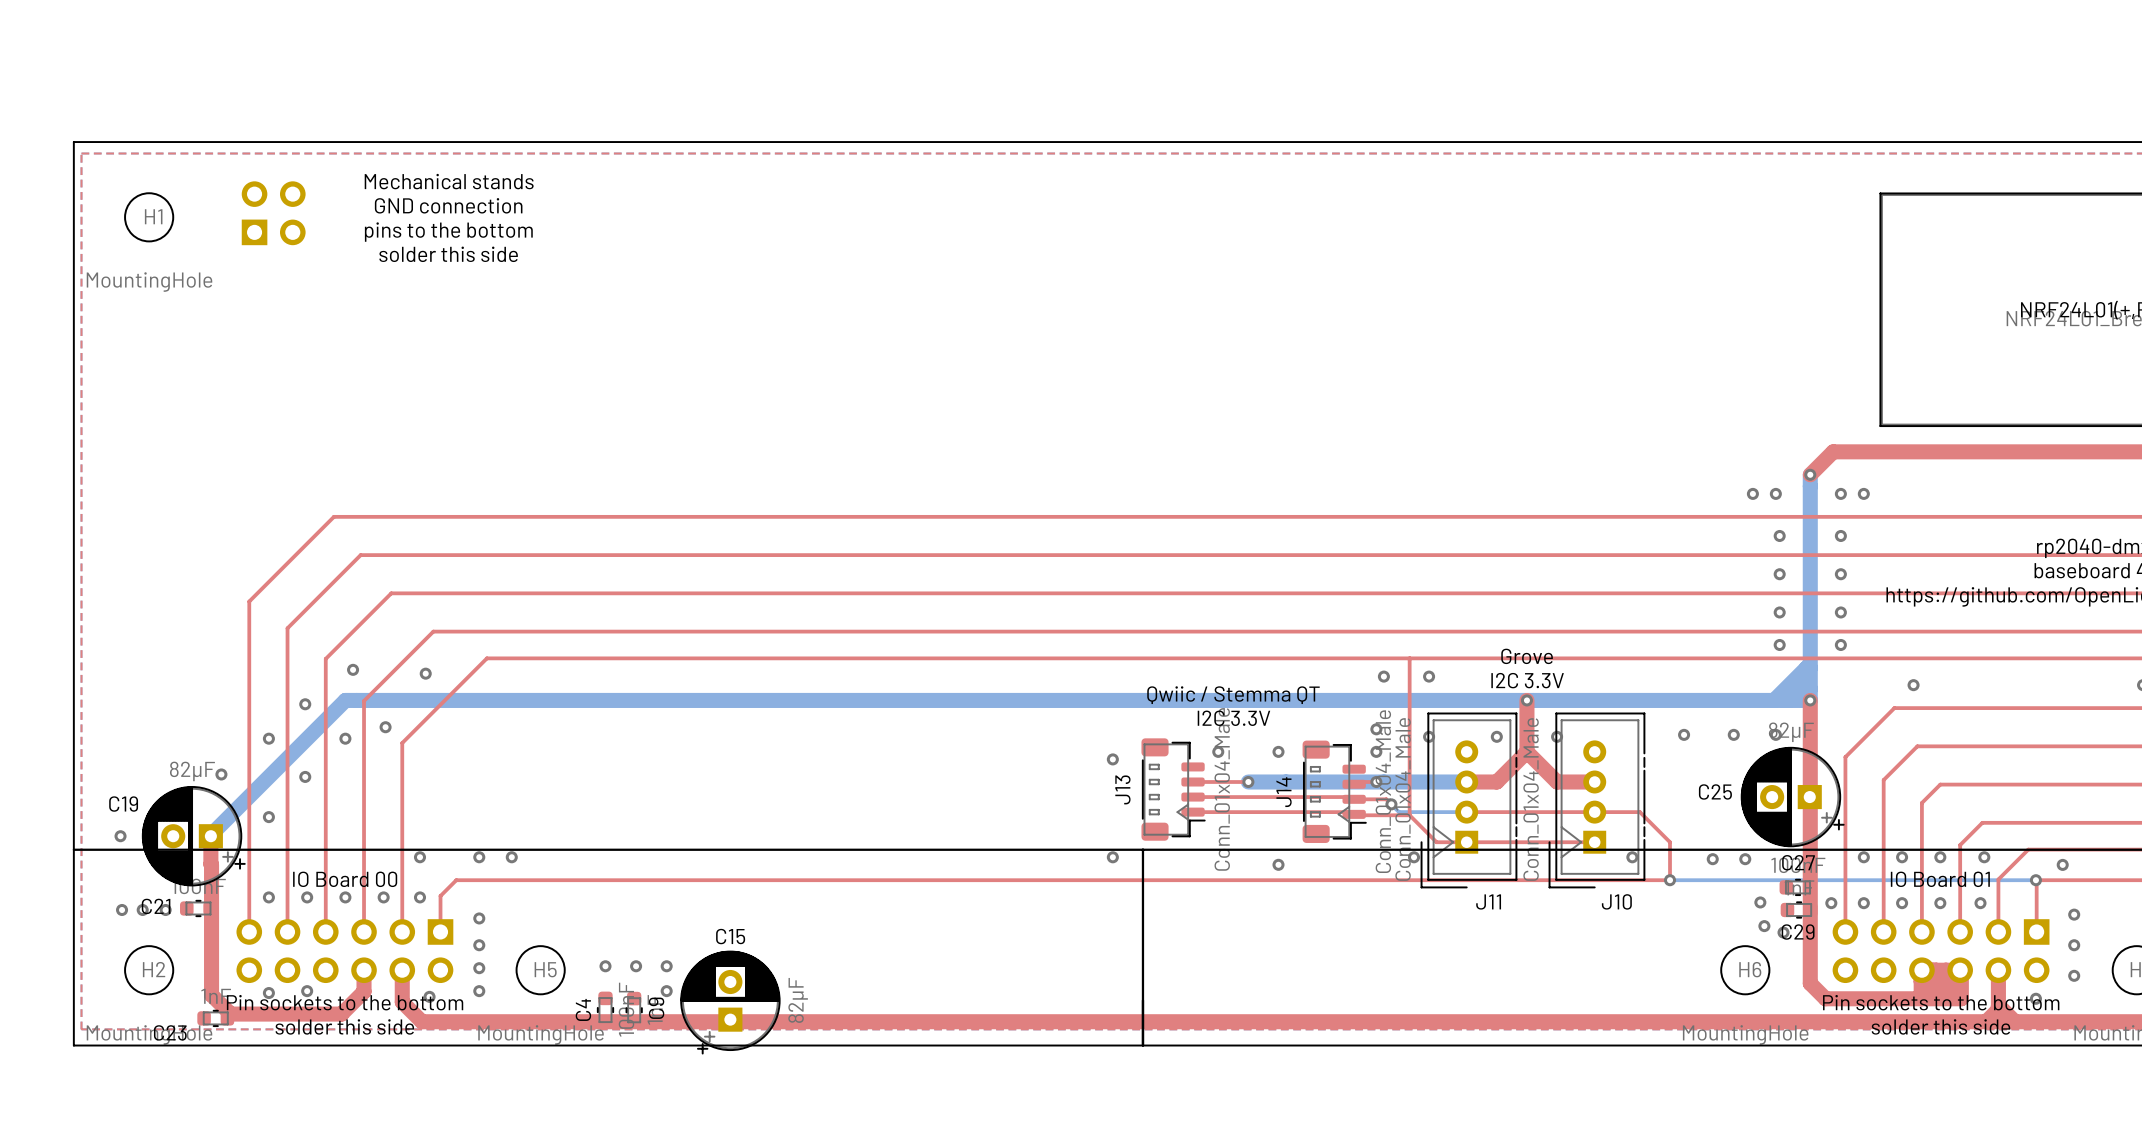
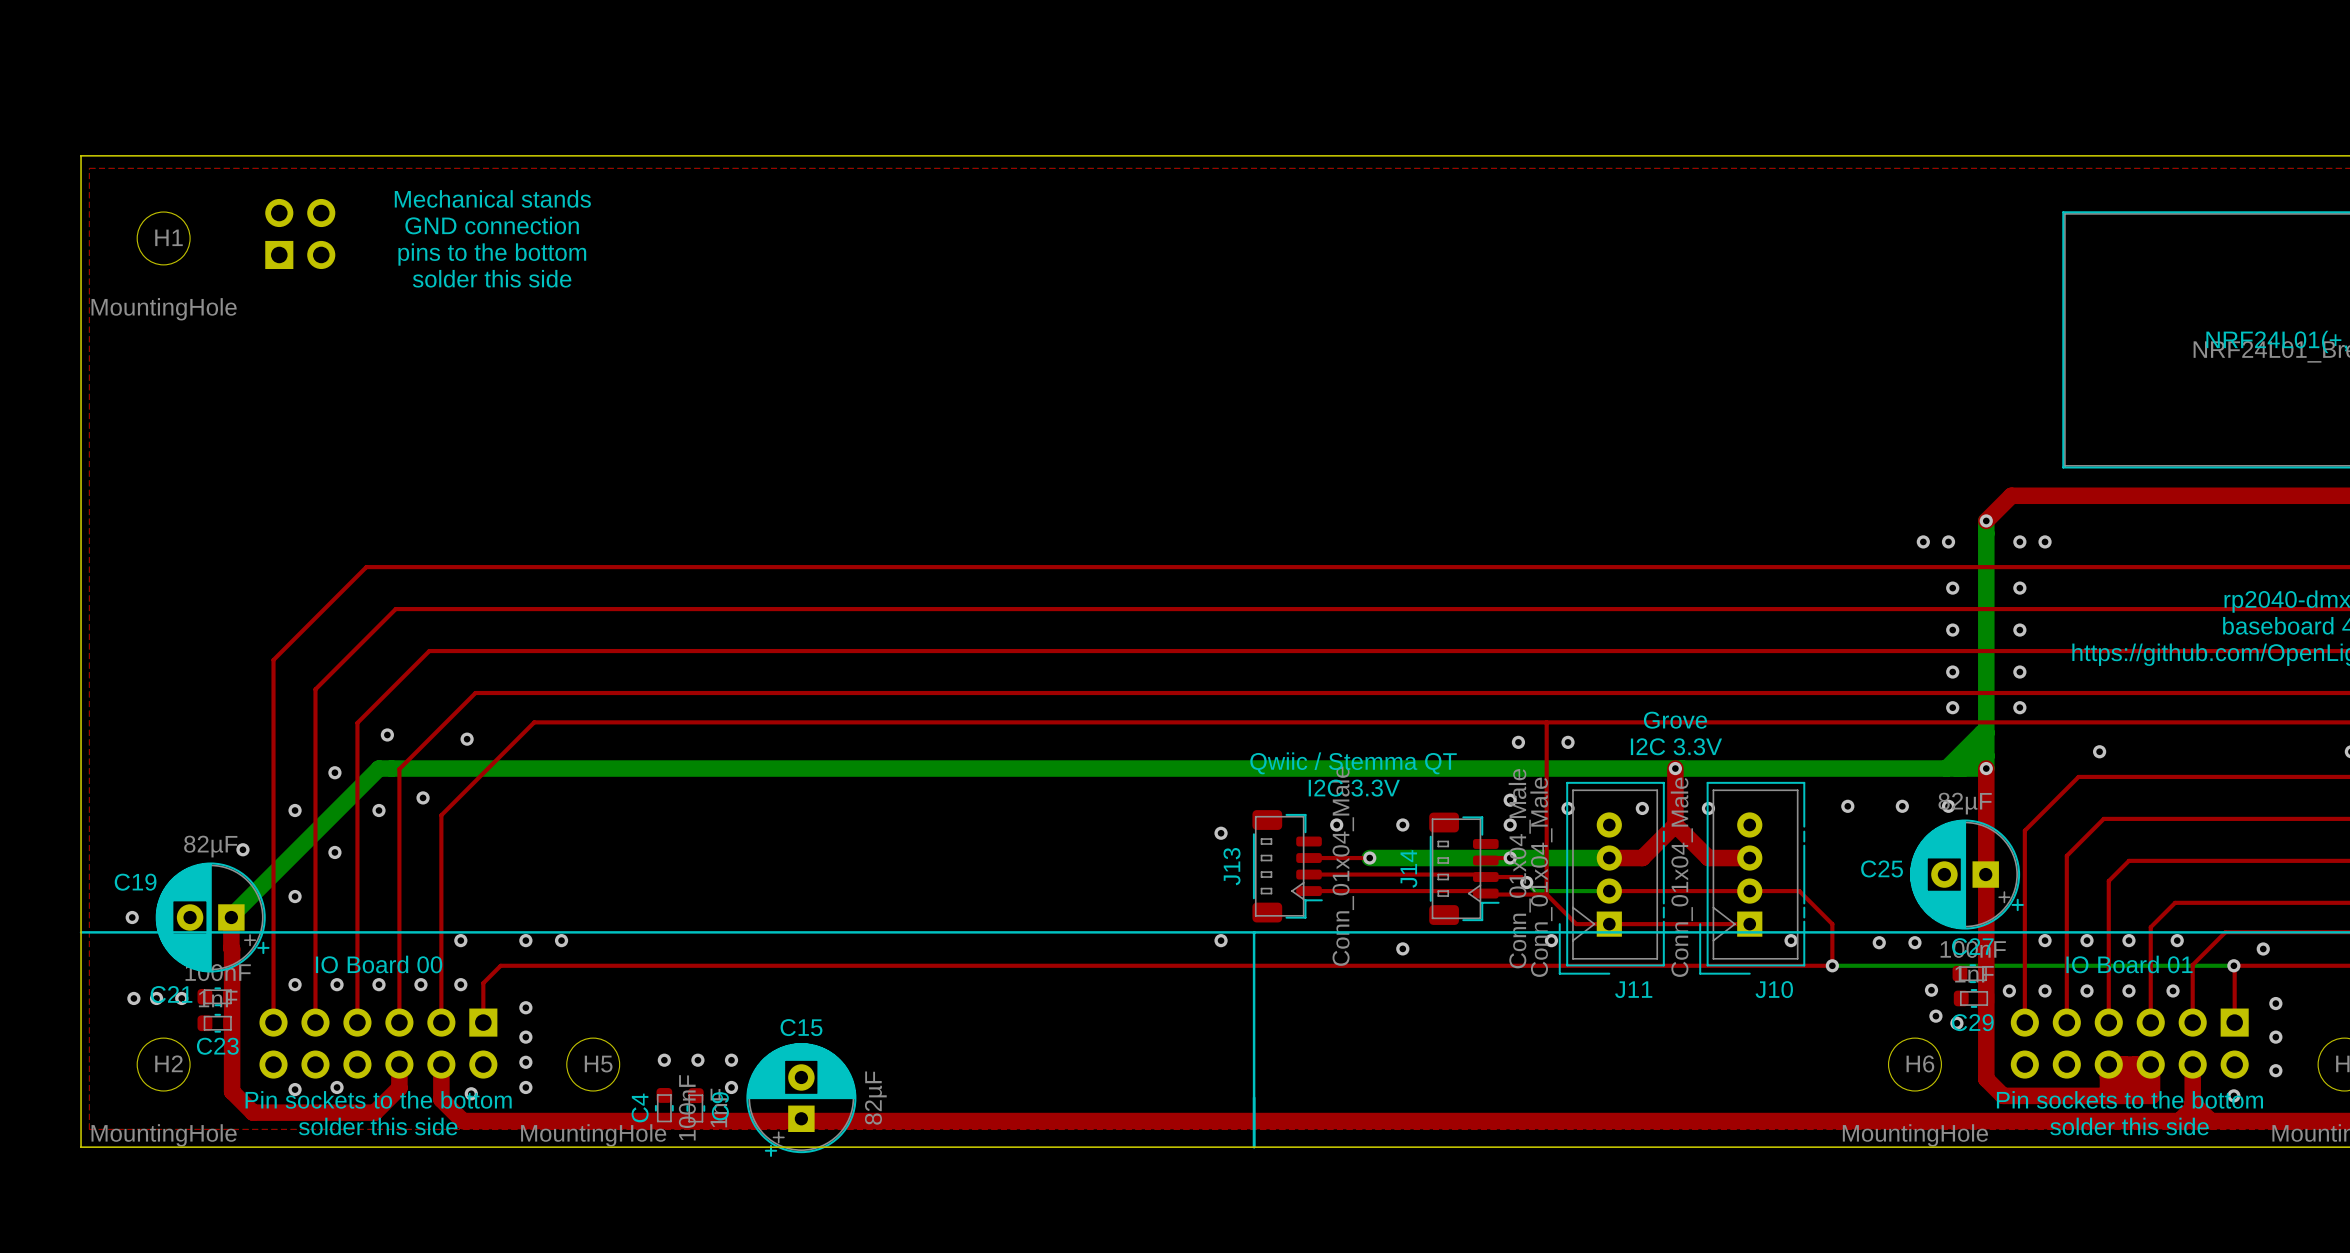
C23 position: (215, 1018) -> (217, 1023)
C23 name position: C23 (170, 1032) -> C23 (217, 1046)

